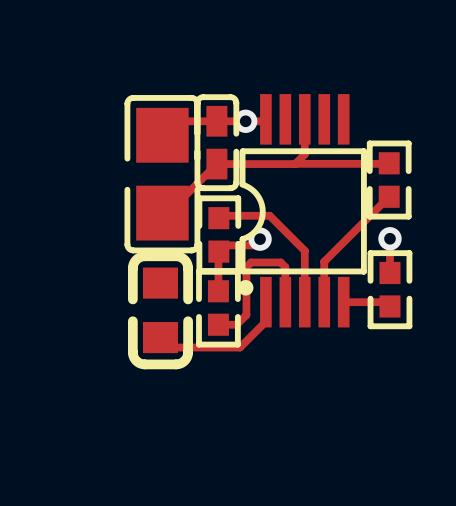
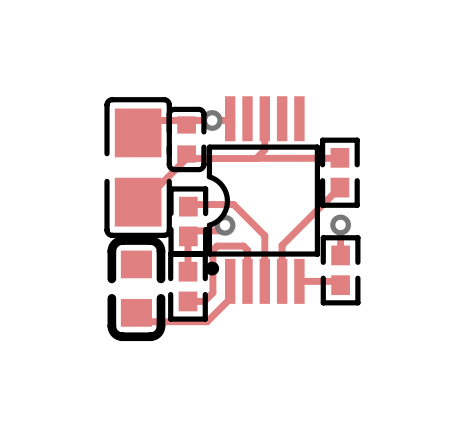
part footprint: [194, 94, 240, 192] -> [166, 106, 207, 173]

